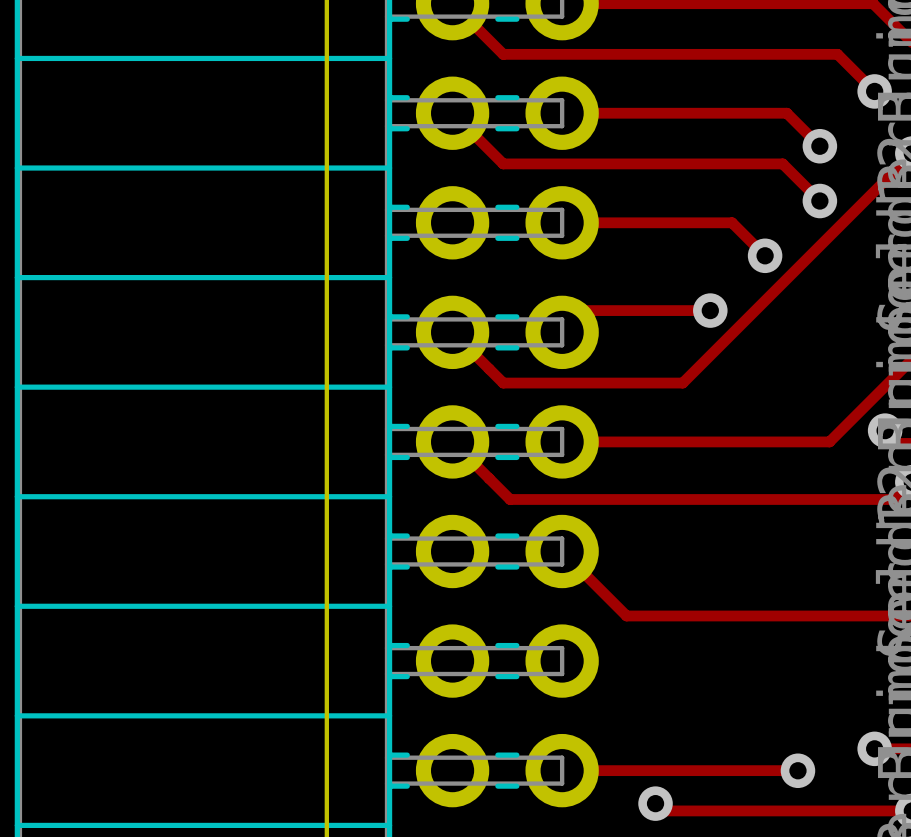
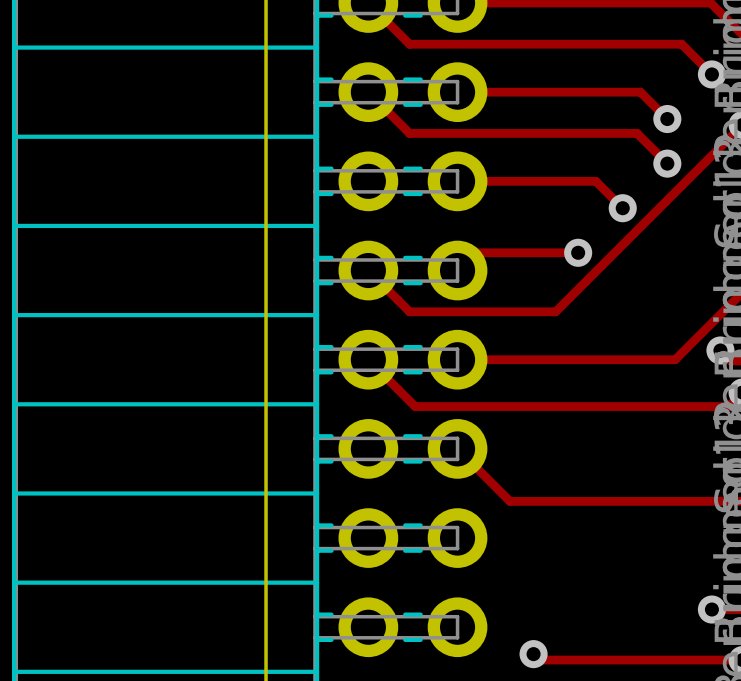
track: (562, 770) (797, 770) -> none
via: (797, 770) -> none

